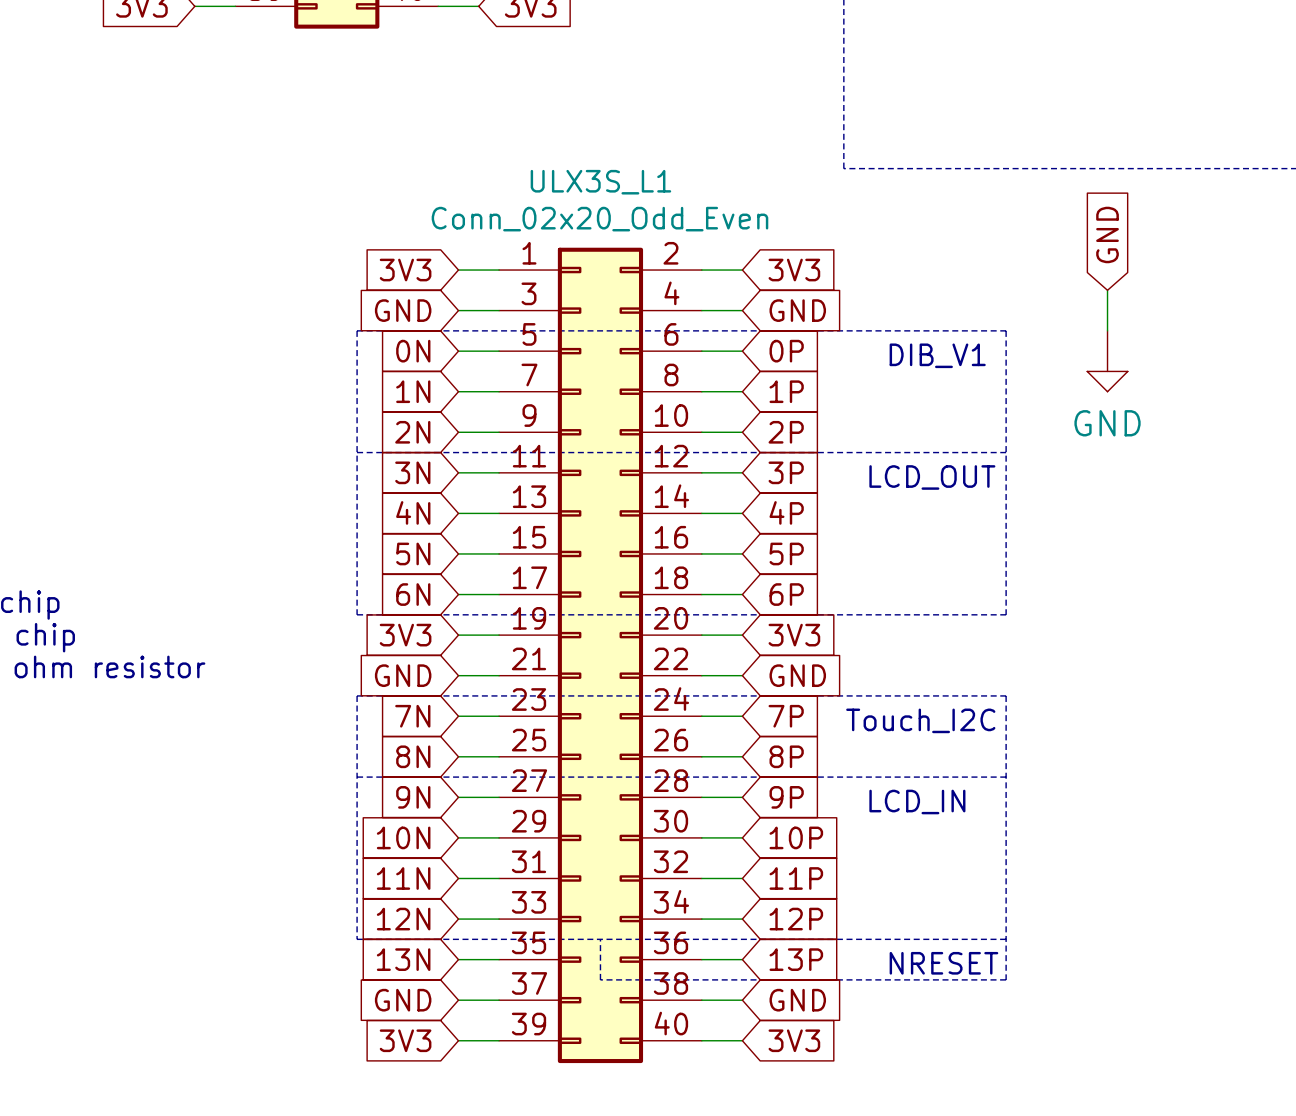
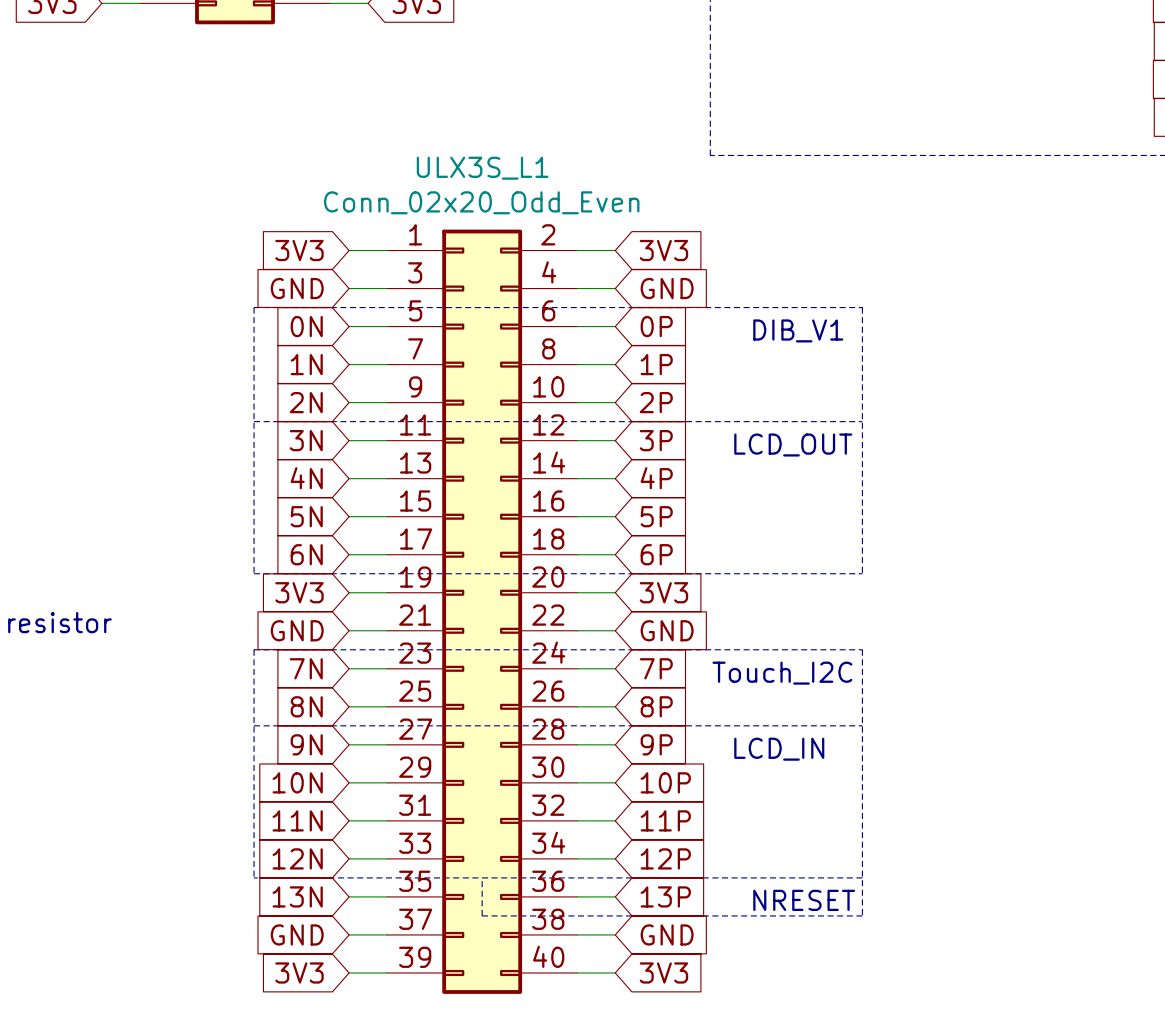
global label: GND (1107, 234) -> none
wire: (1107, 290) (1107, 330) -> none
power symbol: GND (1107, 361) -> none

